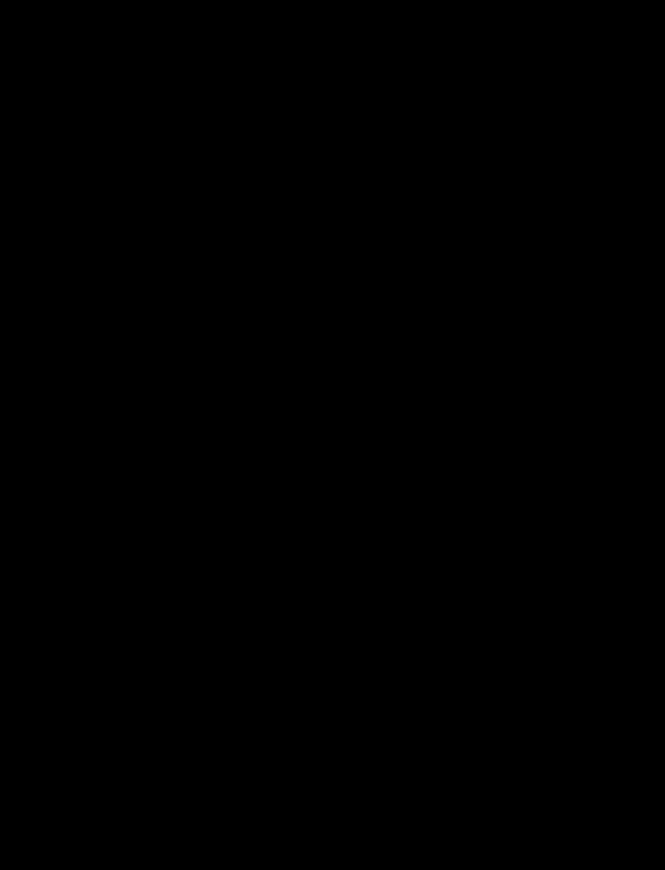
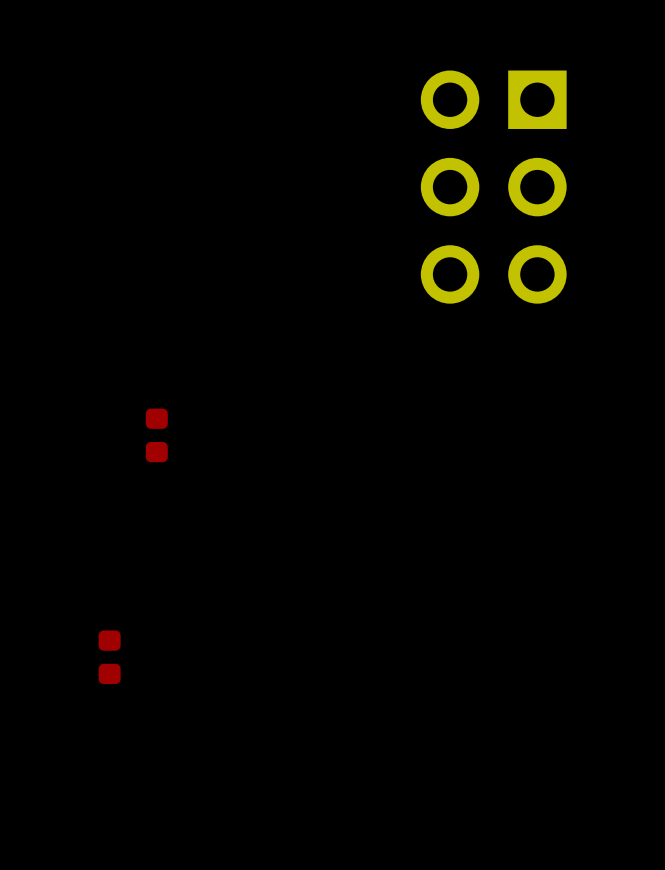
part: none -> (493, 187)
part: none -> (156, 435)
part: none -> (109, 657)

